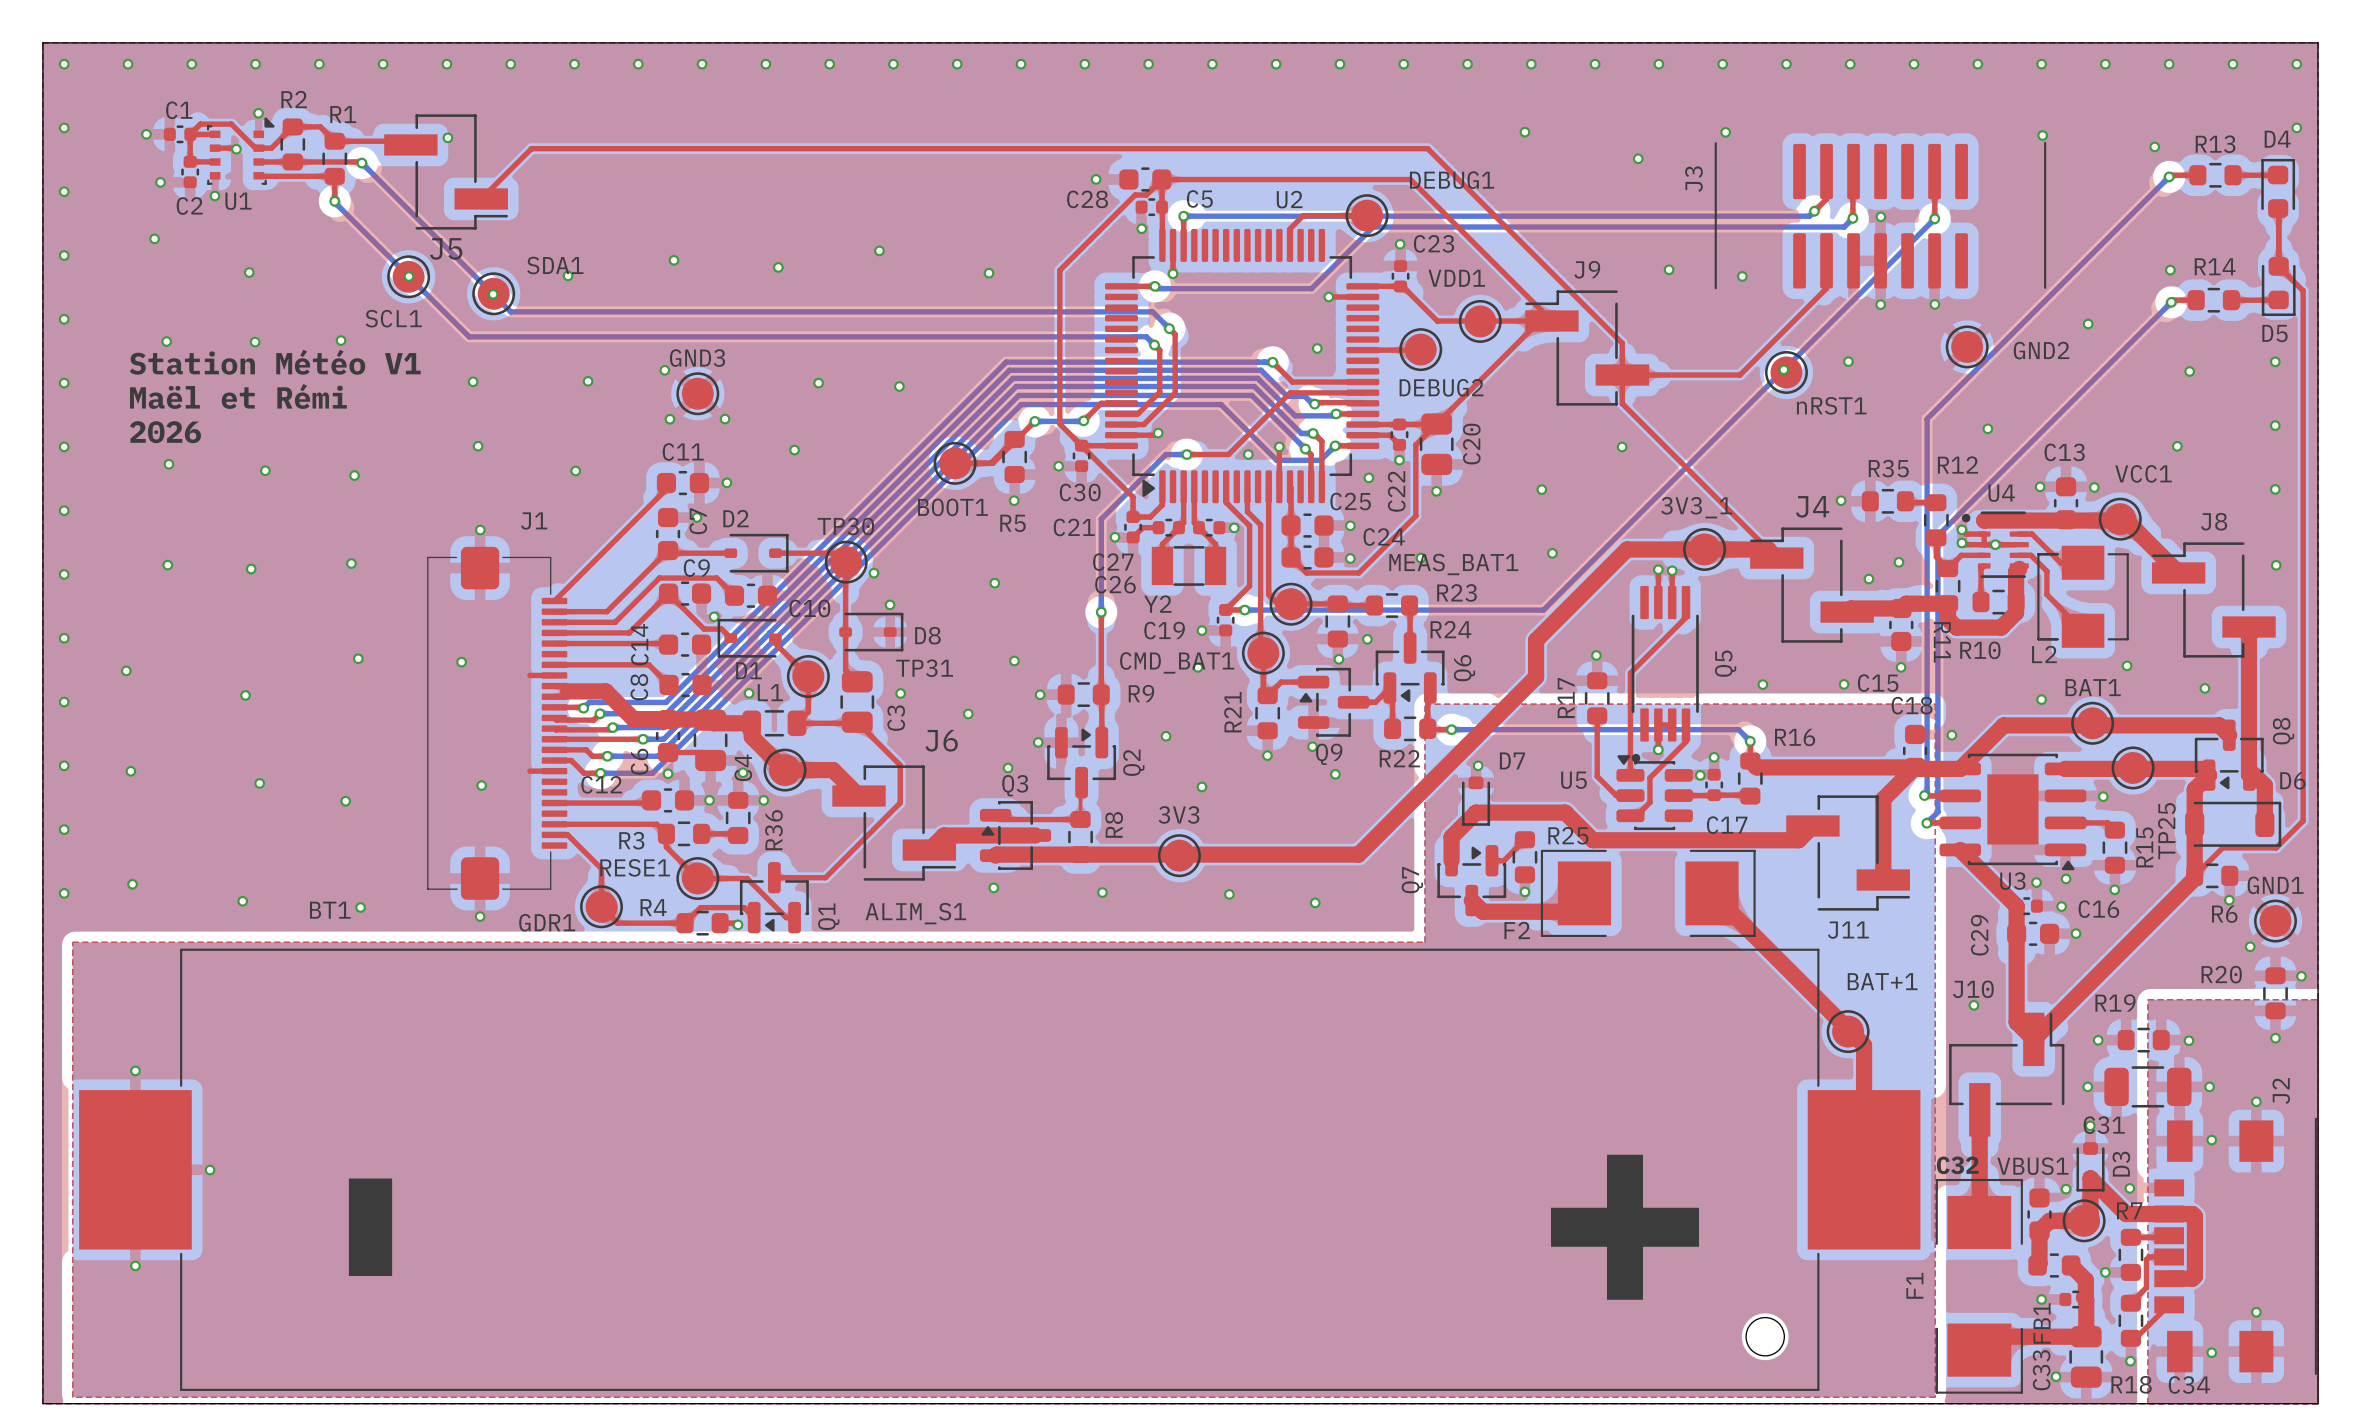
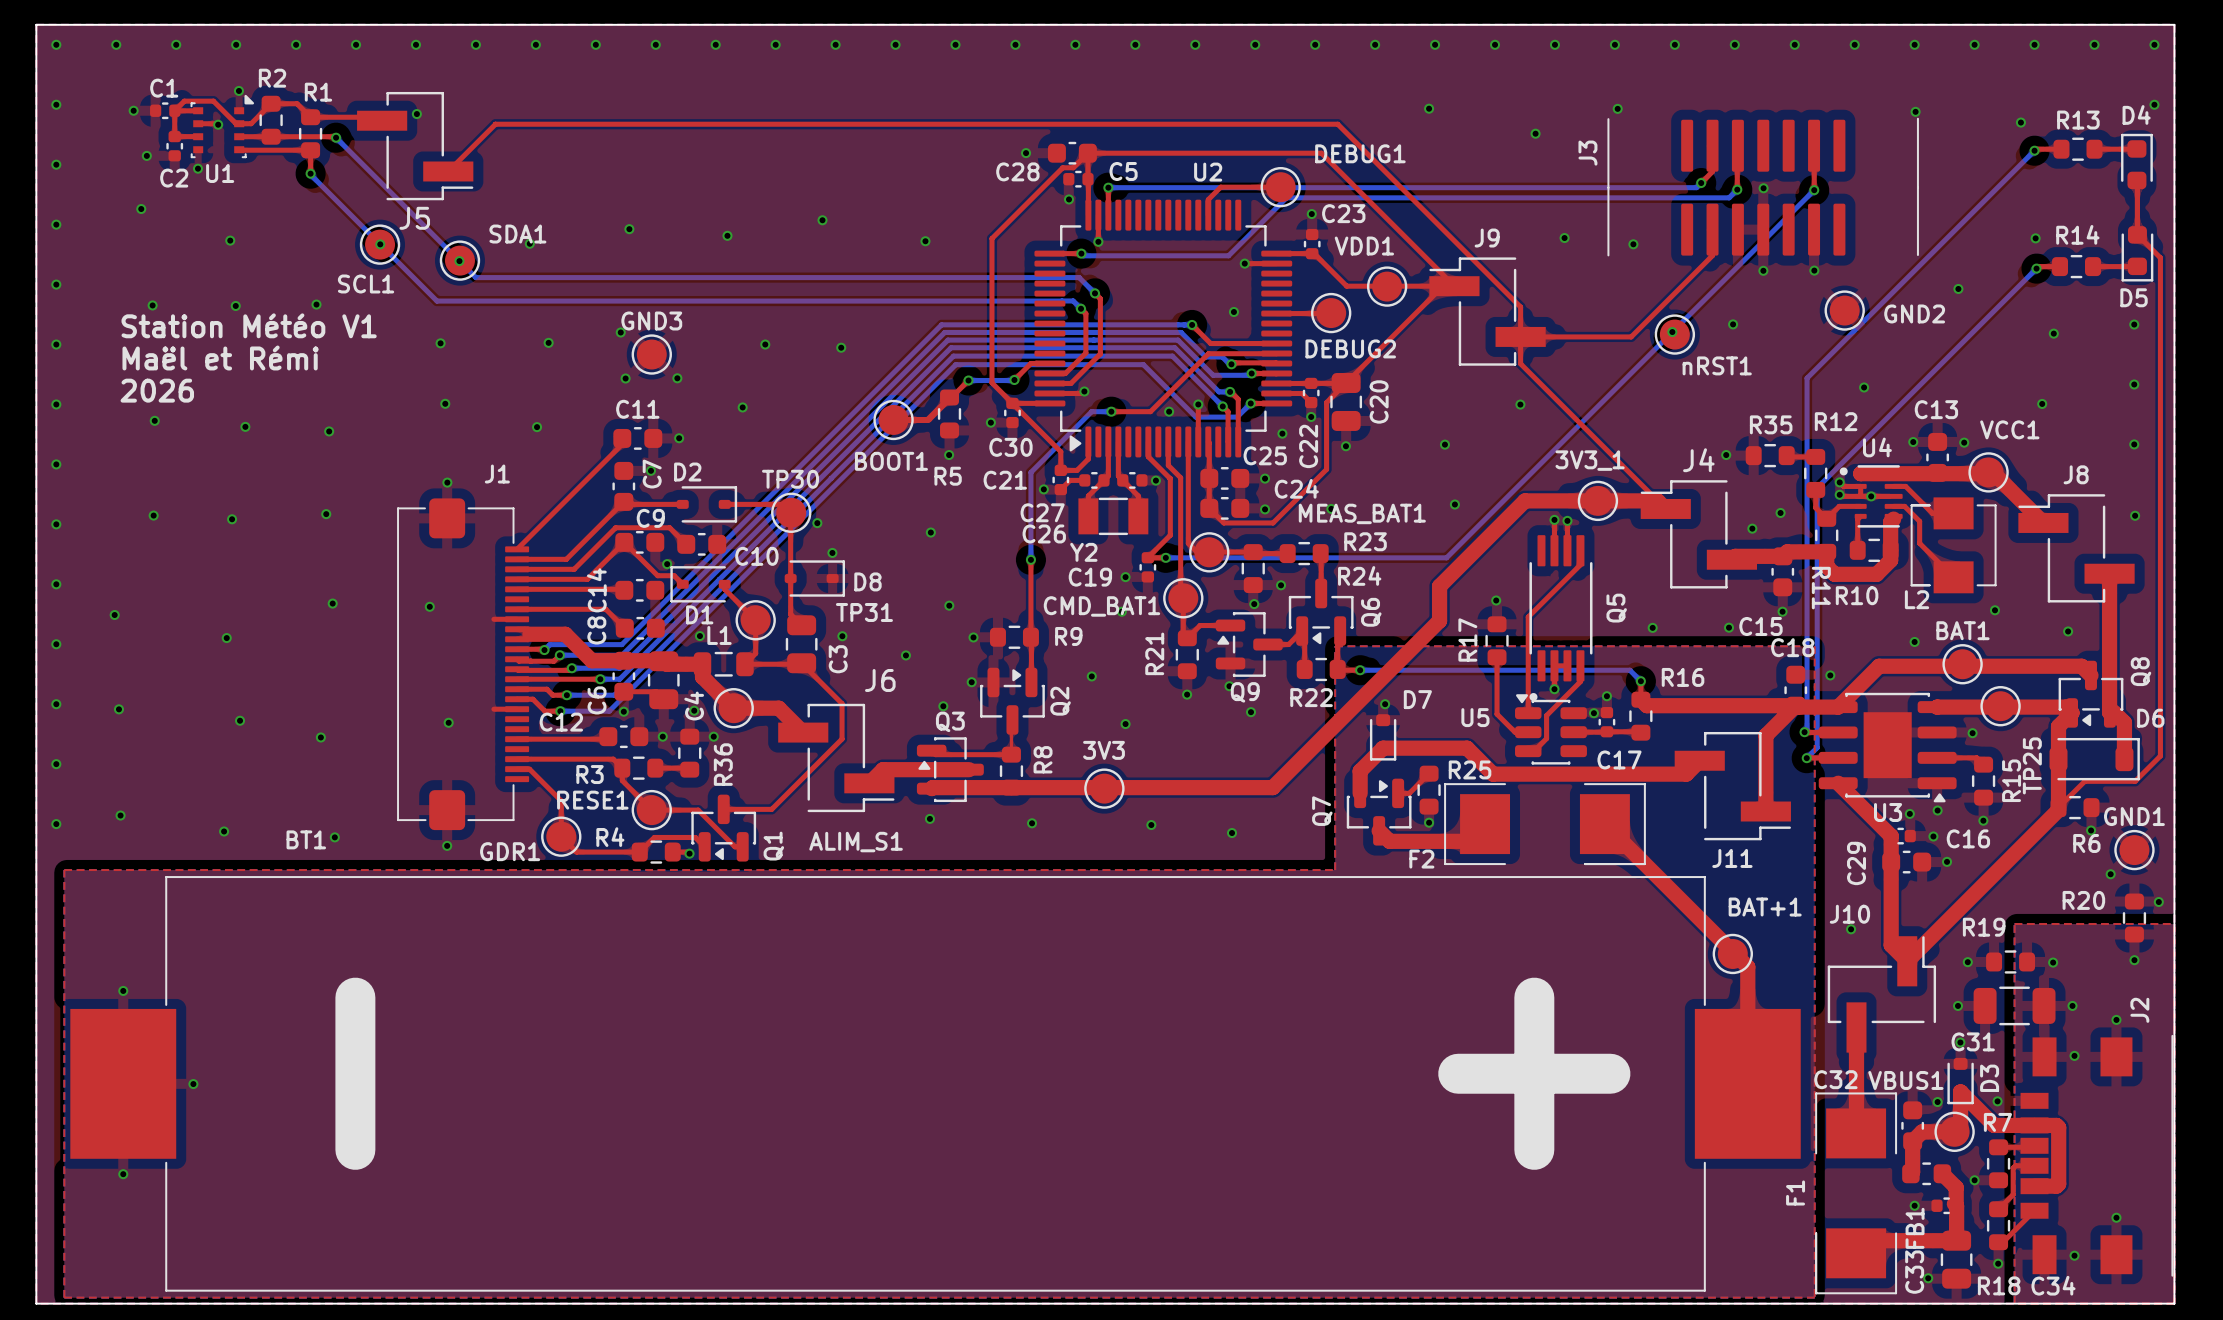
BT1 footprint: [79, 948, 1921, 1391] -> [70, 876, 1801, 1292]

